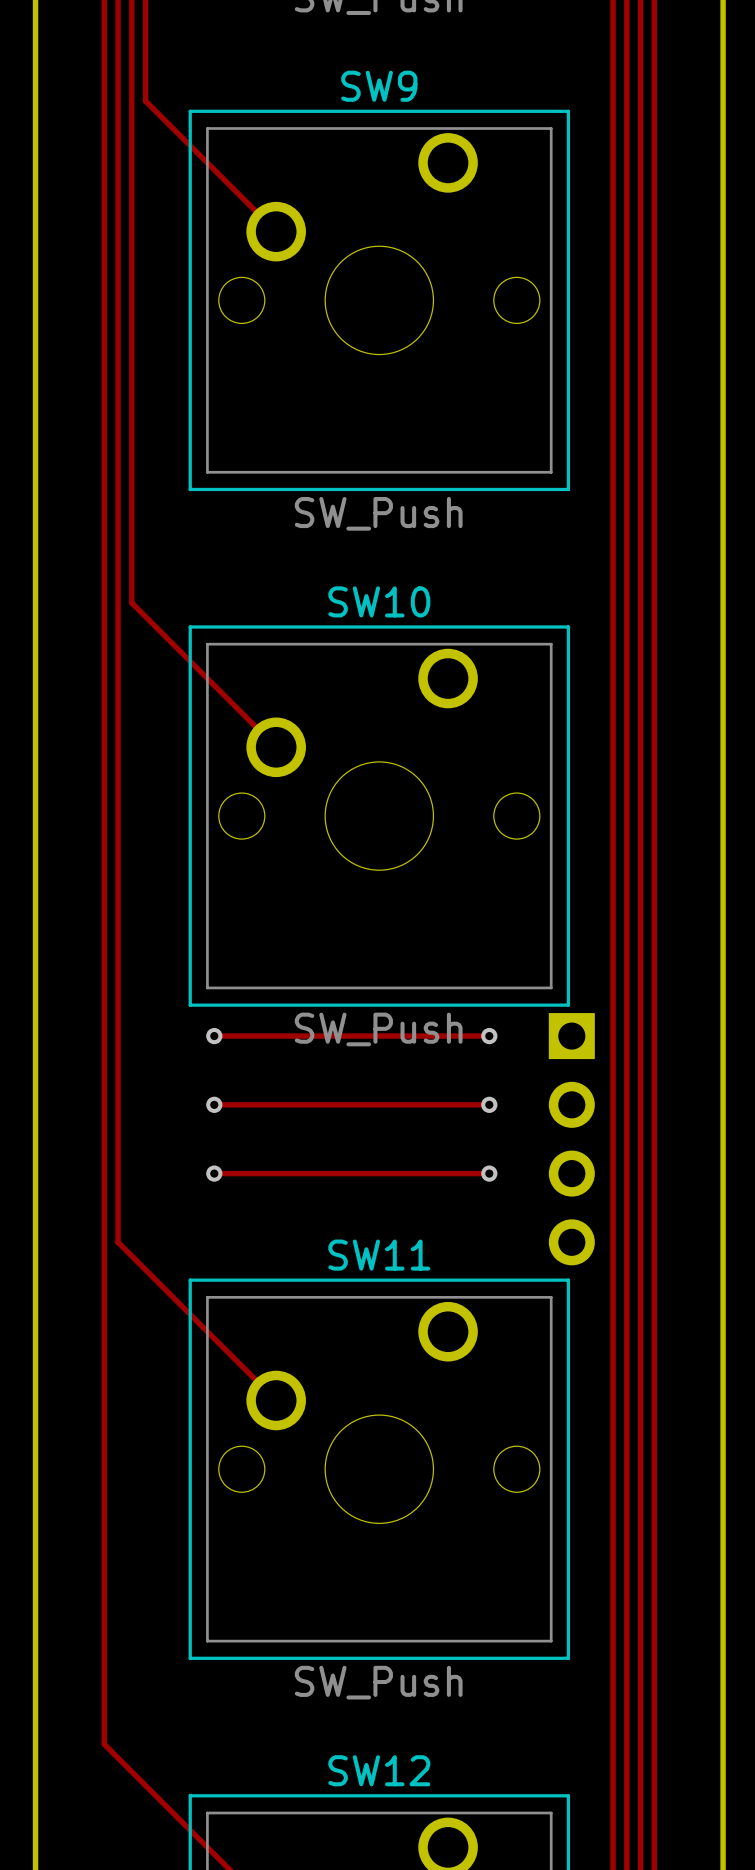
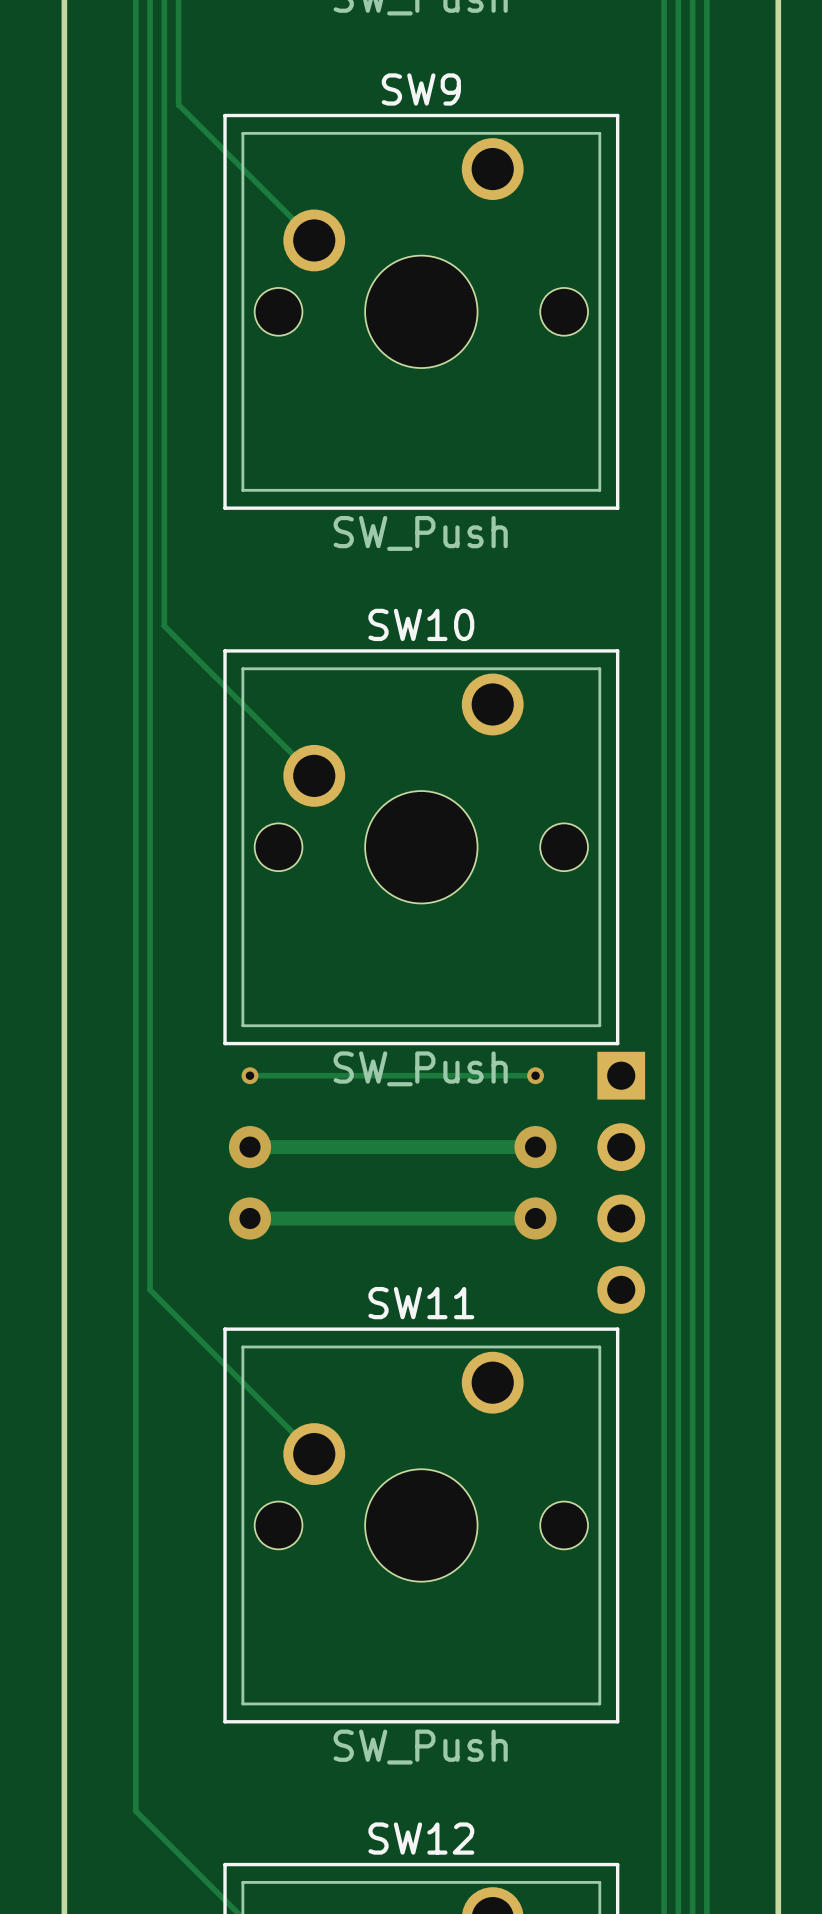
via size: [206, 1096, 223, 1113] -> [228, 1126, 272, 1169]
via size: [481, 1096, 498, 1113] -> [514, 1126, 557, 1169]
track width: thin (214, 1104) (489, 1104) -> thick (250, 1147) (535, 1147)
via size: [206, 1165, 223, 1182] -> [228, 1197, 272, 1240]
via size: [481, 1165, 498, 1182] -> [514, 1197, 557, 1240]
track width: thin (214, 1173) (489, 1173) -> thick (250, 1218) (535, 1218)

